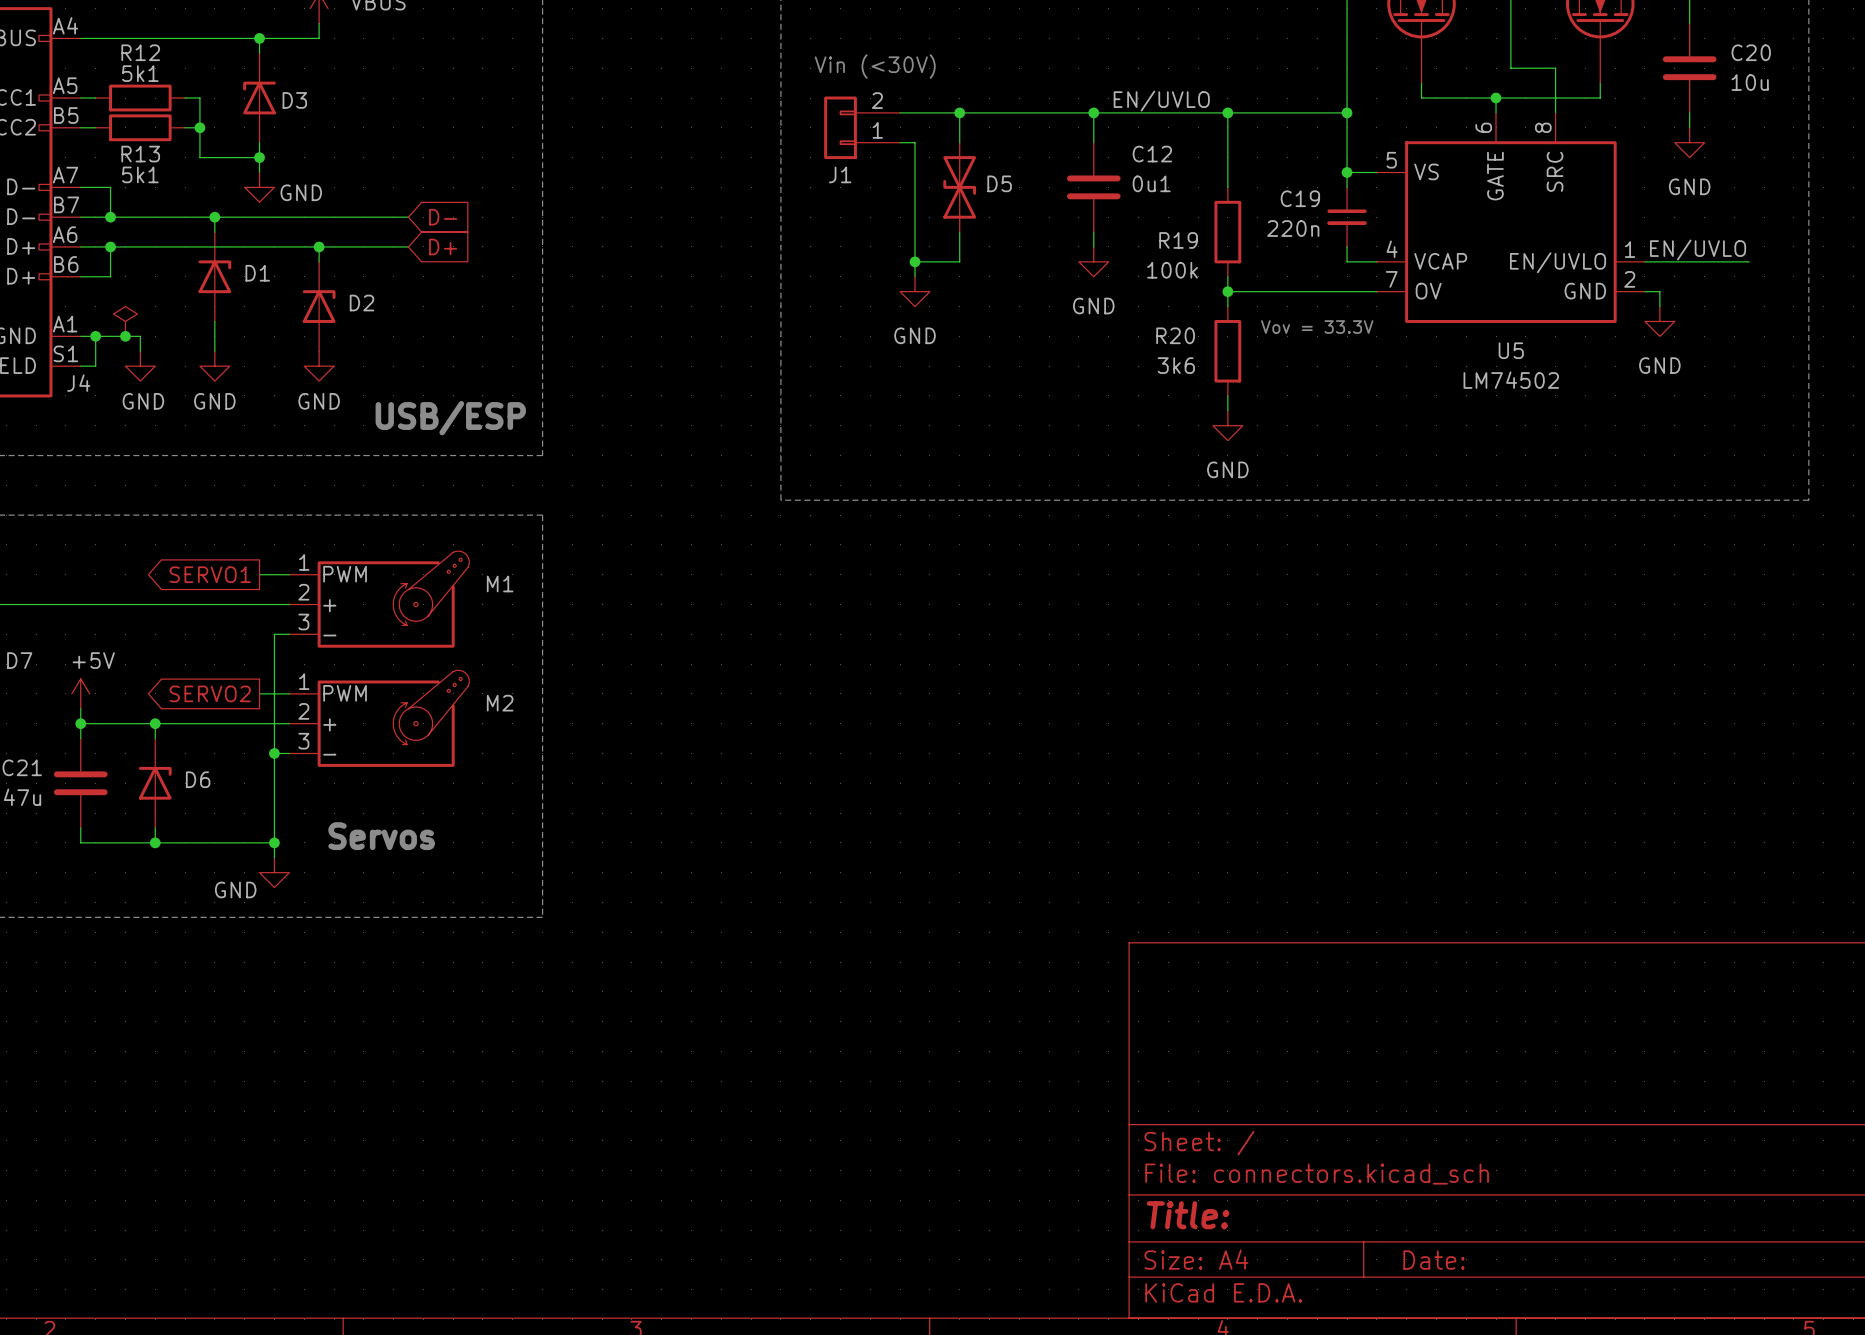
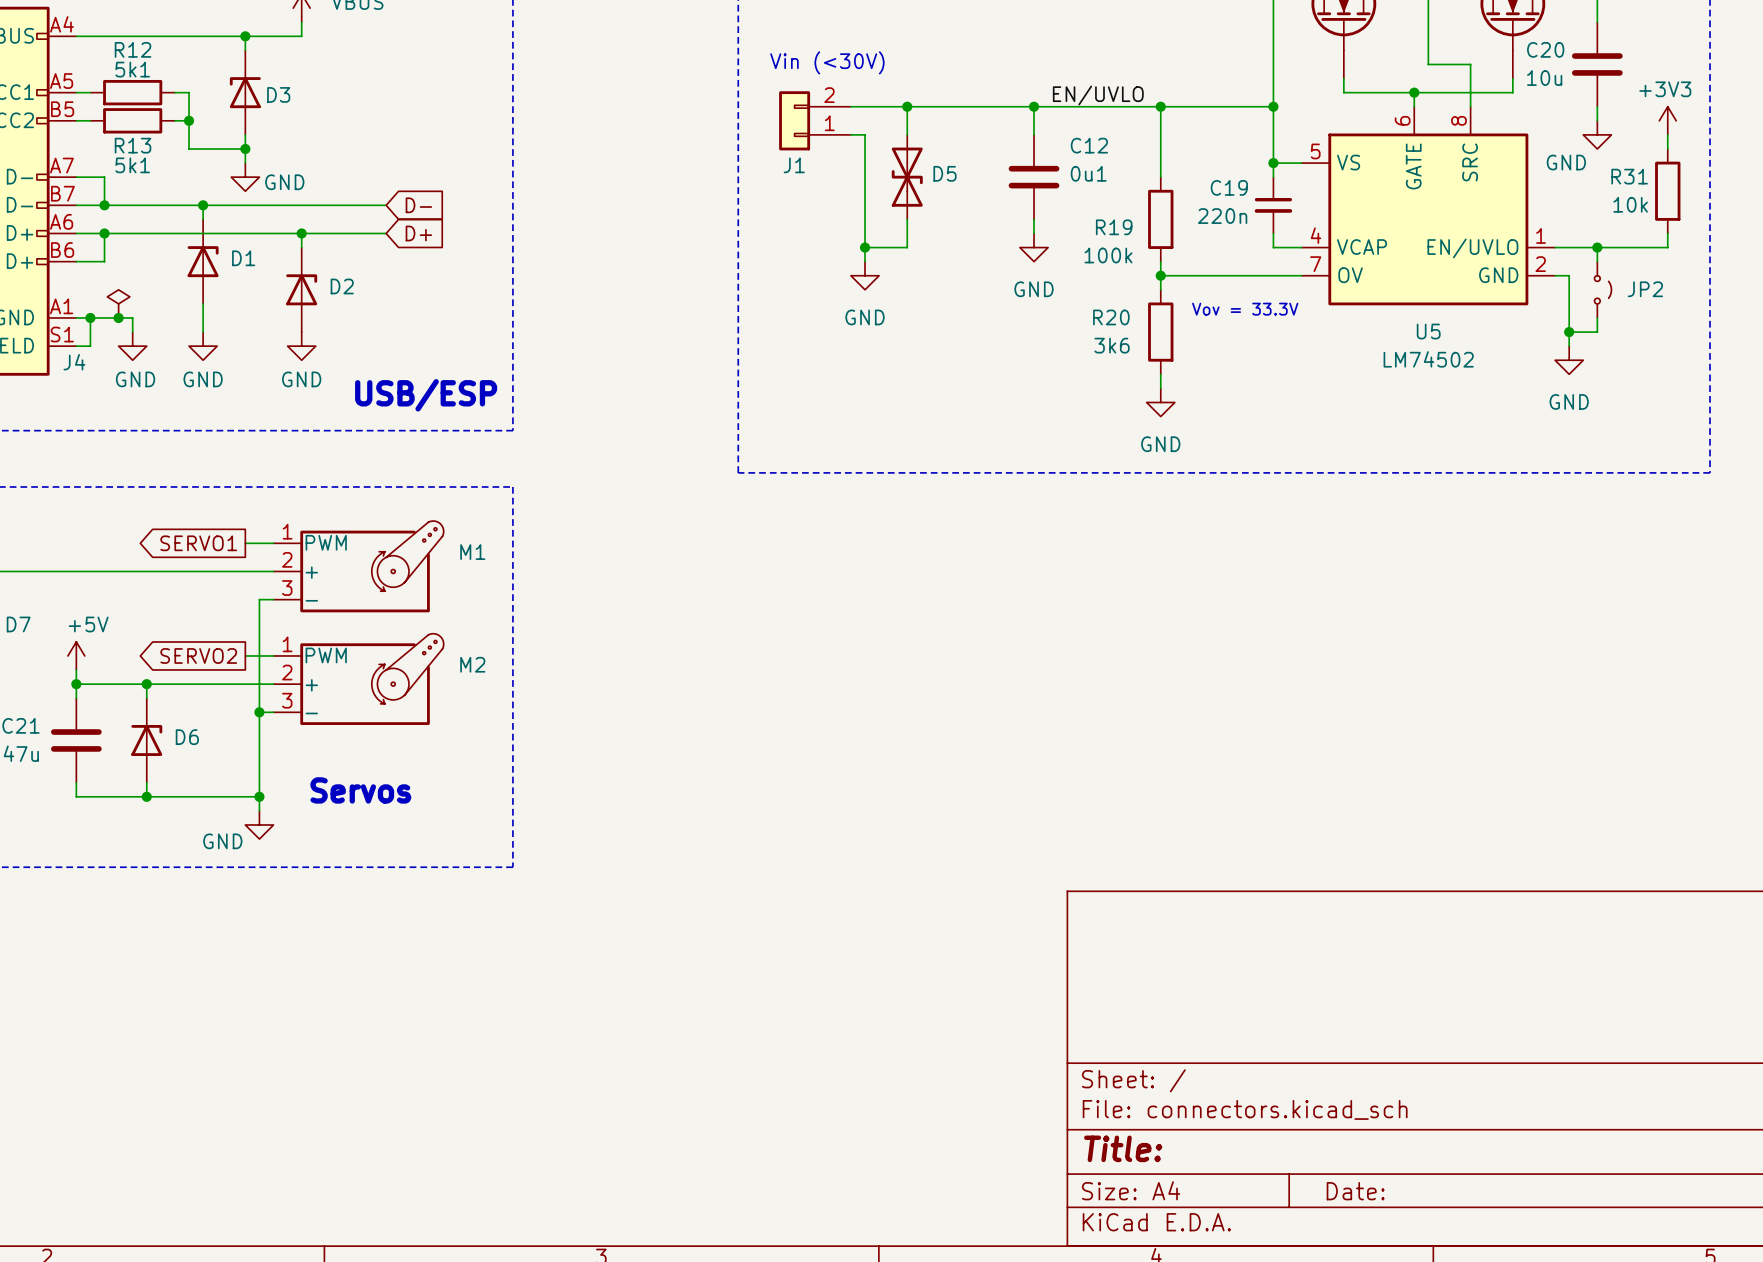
C20 name position: C20 (1751, 52) -> C20 (1545, 49)
C20 value position: 10u (1750, 82) -> 10u (1544, 78)
power symbol: none -> +3V3 (1667, 120)
wire: none -> (1667, 134) (1667, 148)
power symbol text position: GND (1689, 186) -> GND (1566, 162)
R31: none -> 10k (1667, 191)
wire: none -> (1667, 233) (1667, 247) (1653, 247)
label: EN/UVLO (1698, 250) -> none
wire: none -> (1597, 247) (1597, 261)
junction: none -> (1597, 247)
wire: none -> (1569, 289) (1569, 346)
JP2: none -> (1603, 289)
power symbol position: GND (1659, 321) -> GND (1569, 360)
wire: none -> (1597, 317) (1597, 332) (1569, 332)
junction: none -> (1569, 332)

